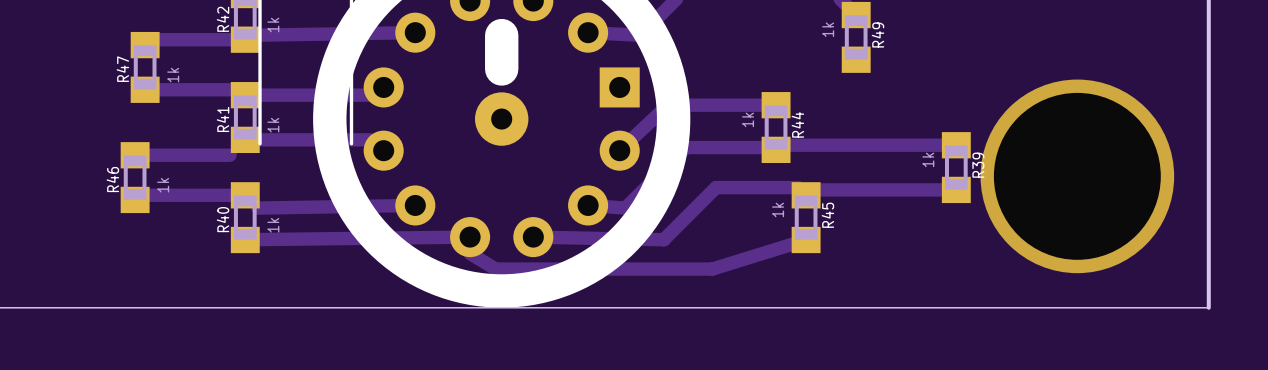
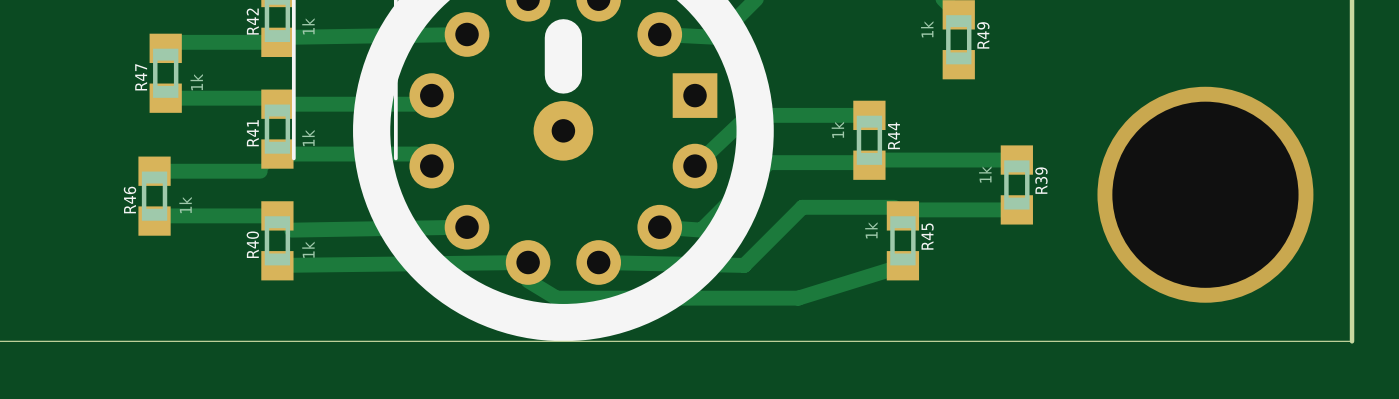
track: (908, 145) (956, 145) -> none
R39 position: (956, 167) -> (1016, 184)
track: (908, 189) (956, 189) -> none

